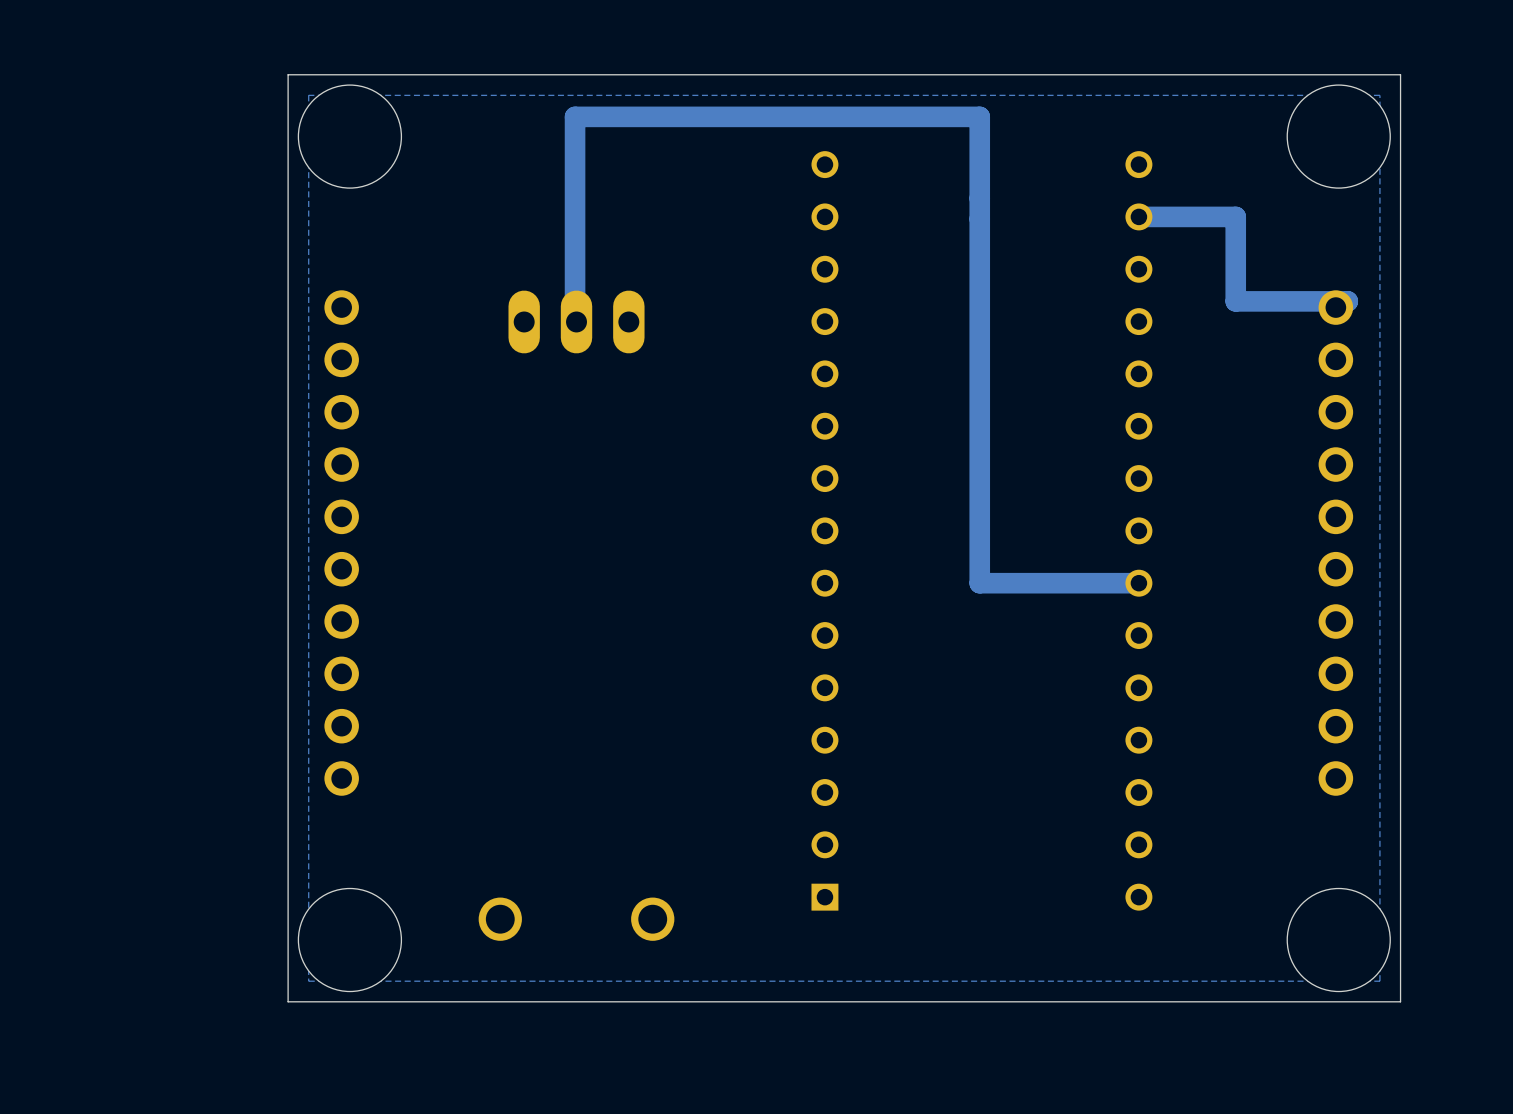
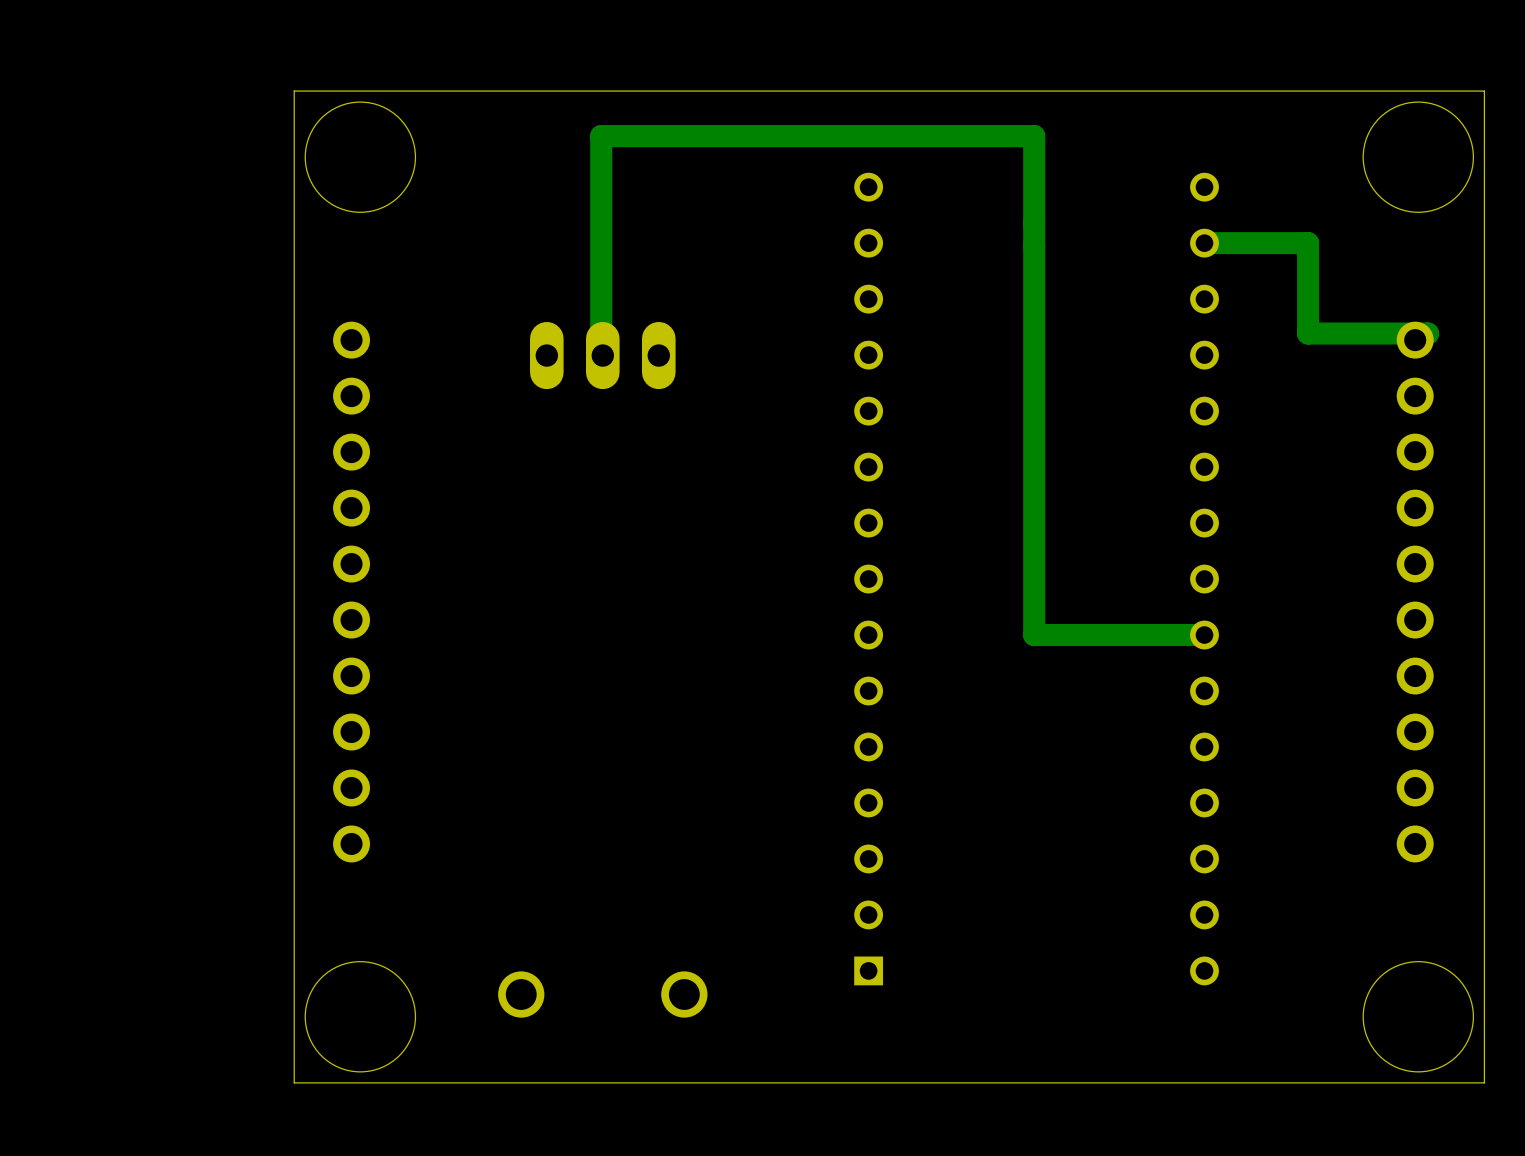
zone outline: (1379, 95) (308, 95) (308, 981) (1379, 981) (1379, 95) -> none

